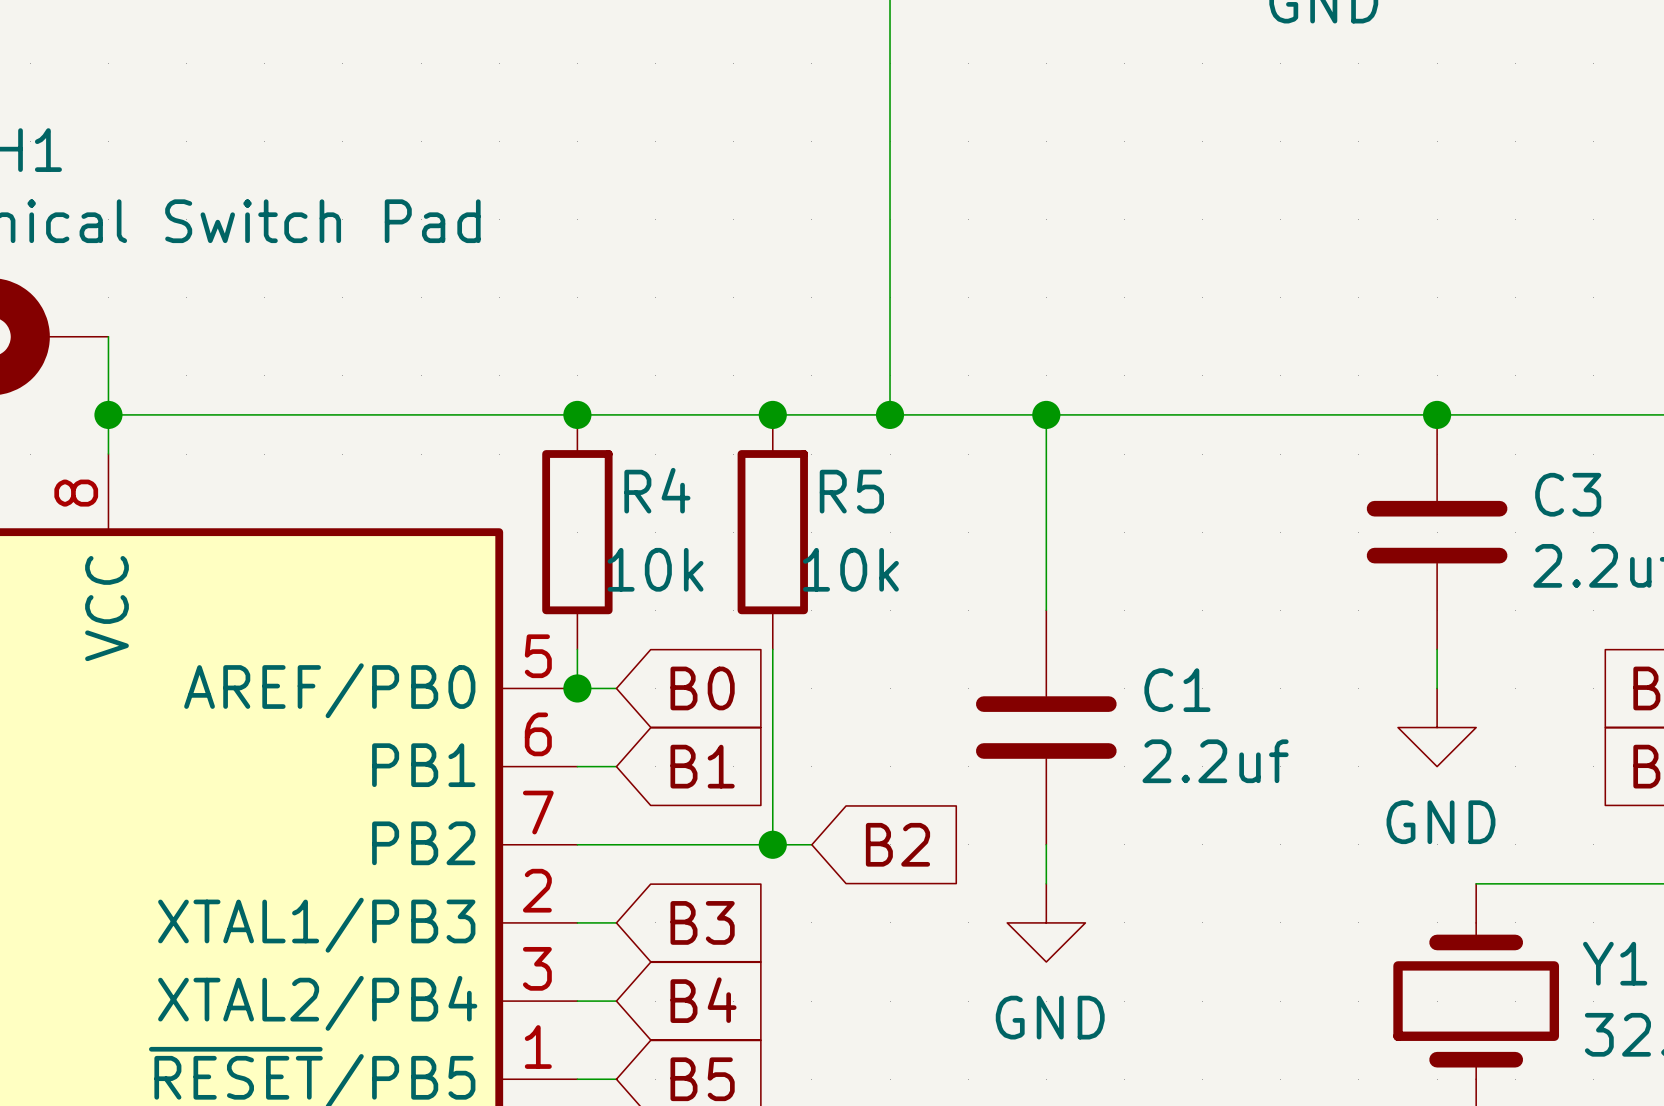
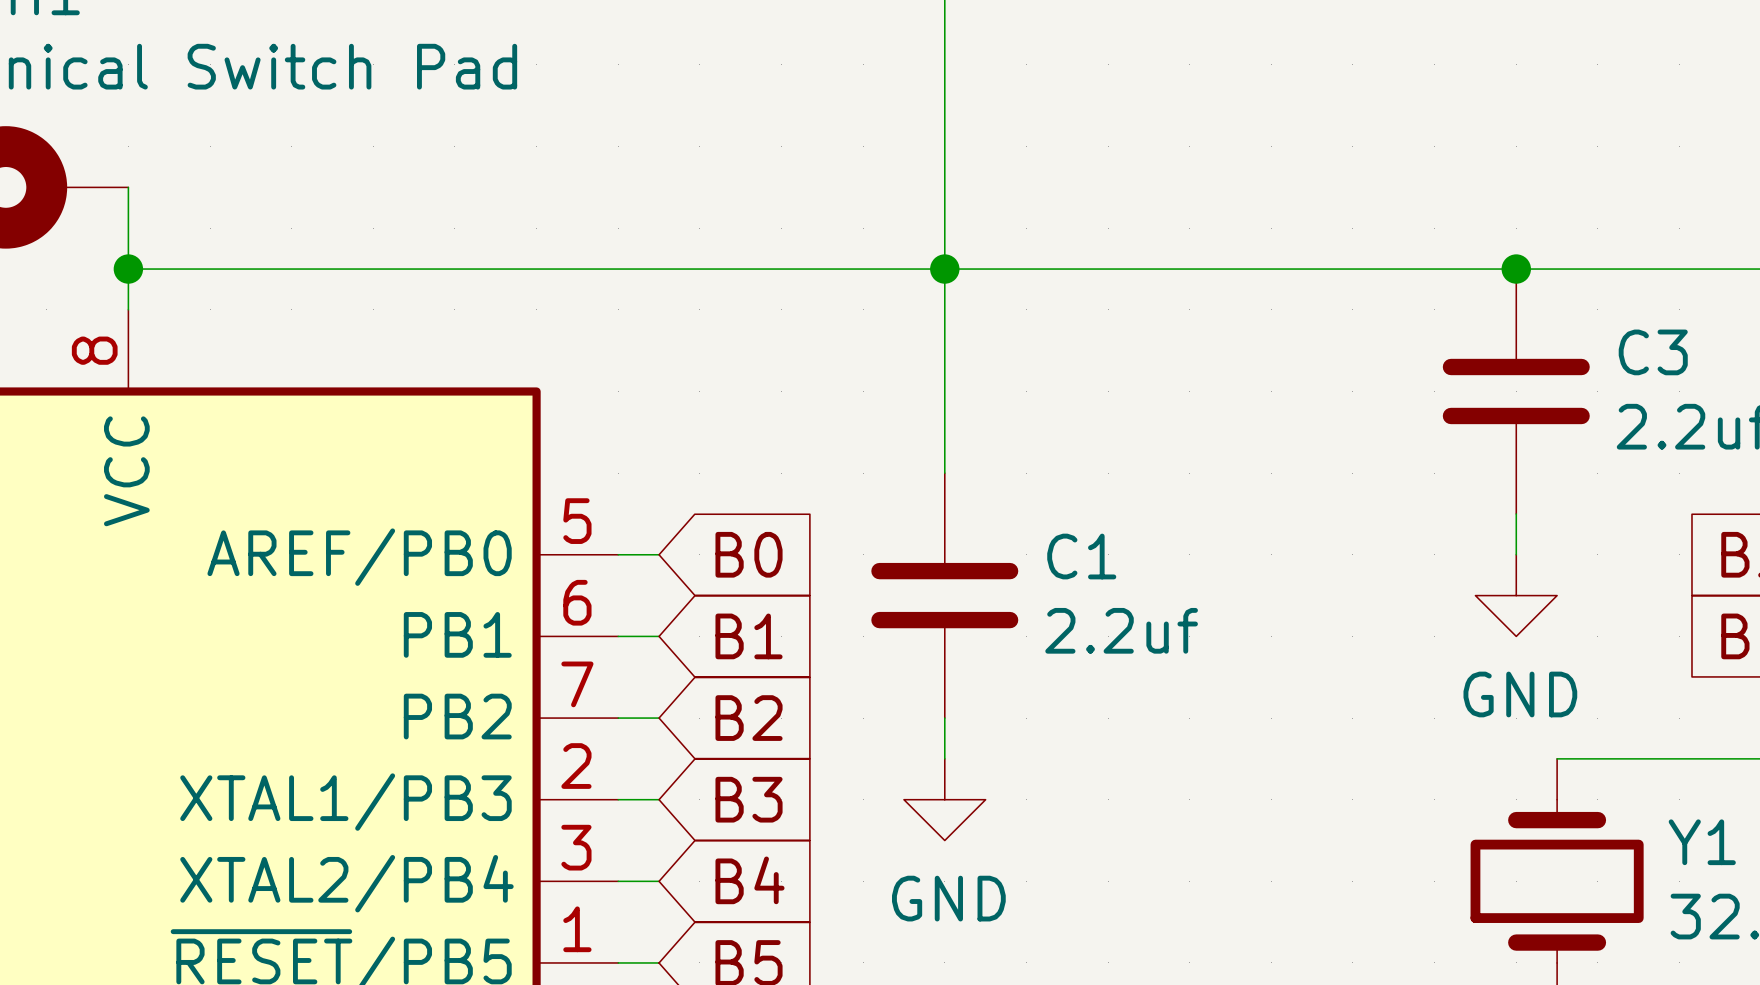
junction: (577, 414) -> none
junction: (772, 414) -> none
wire: (1046, 414) (1046, 610) -> (944, 269) (944, 473)
junction: (1046, 414) -> none
R4: 10k (577, 532) -> none
R5: 10k (772, 532) -> none
wire: (577, 649) (577, 688) -> none
wire: (772, 649) (772, 844) -> none
junction: (577, 688) -> none
C1 position: (1046, 727) -> (944, 595)
wire: (616, 844) (811, 844) -> none
junction: (772, 844) -> none
global label position: B2 (897, 844) -> B2 (749, 718)
wire: (1046, 844) (1046, 883) -> (944, 718) (944, 758)
power symbol position: GND (1046, 922) -> GND (944, 799)

